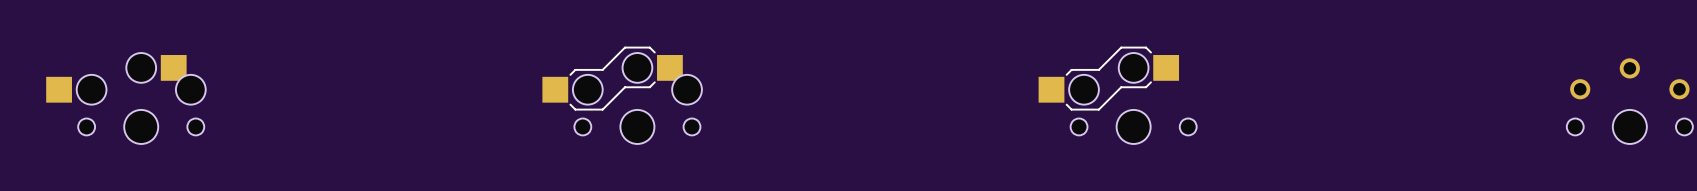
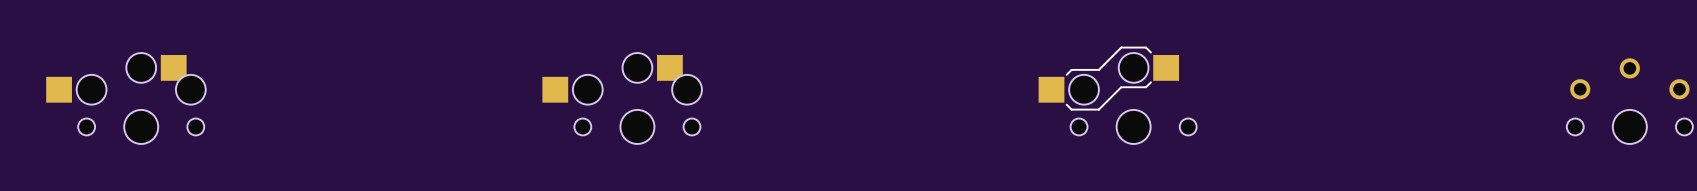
part footprint: [542, 46, 702, 144] -> [542, 53, 702, 144]

